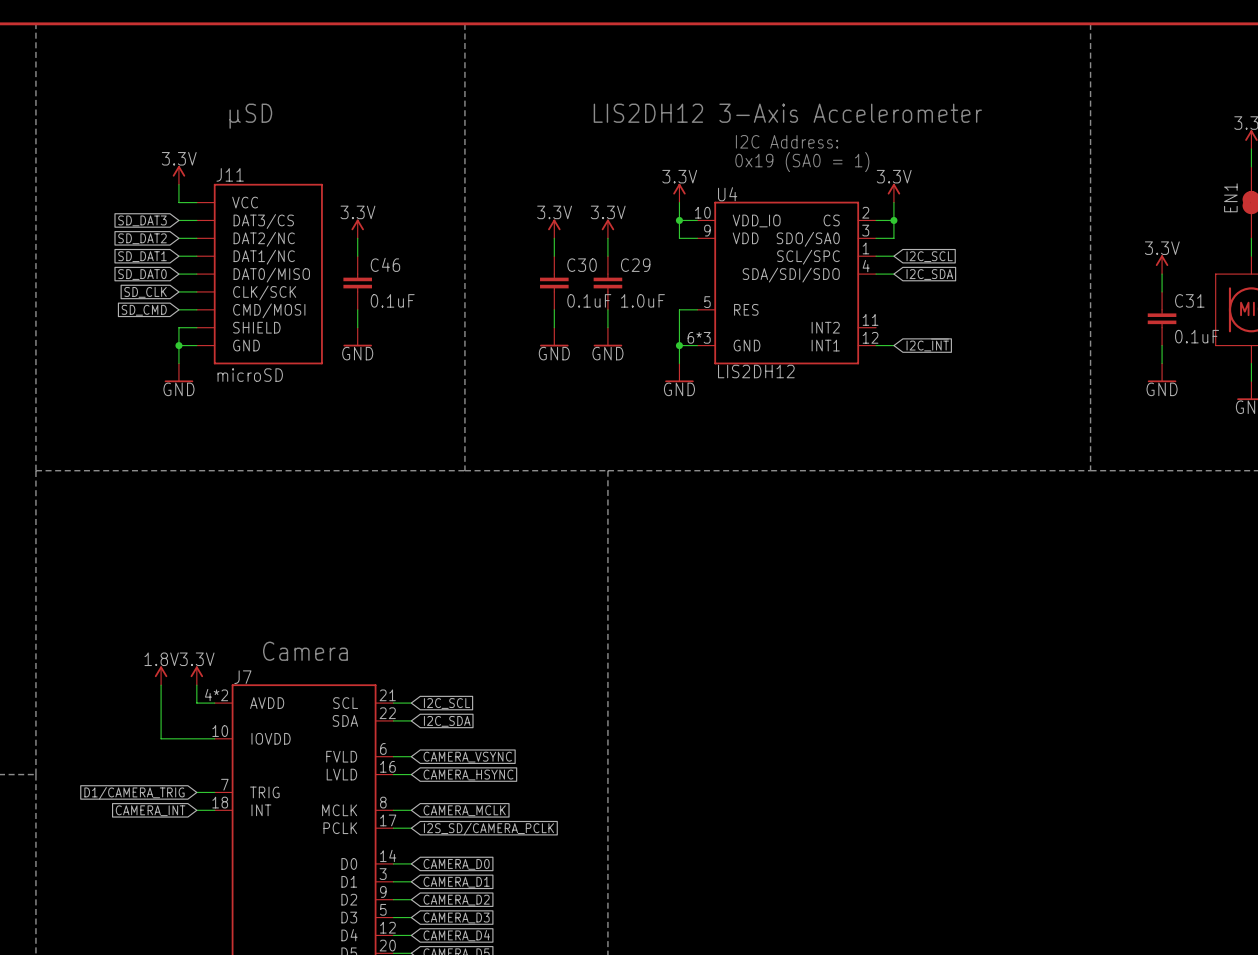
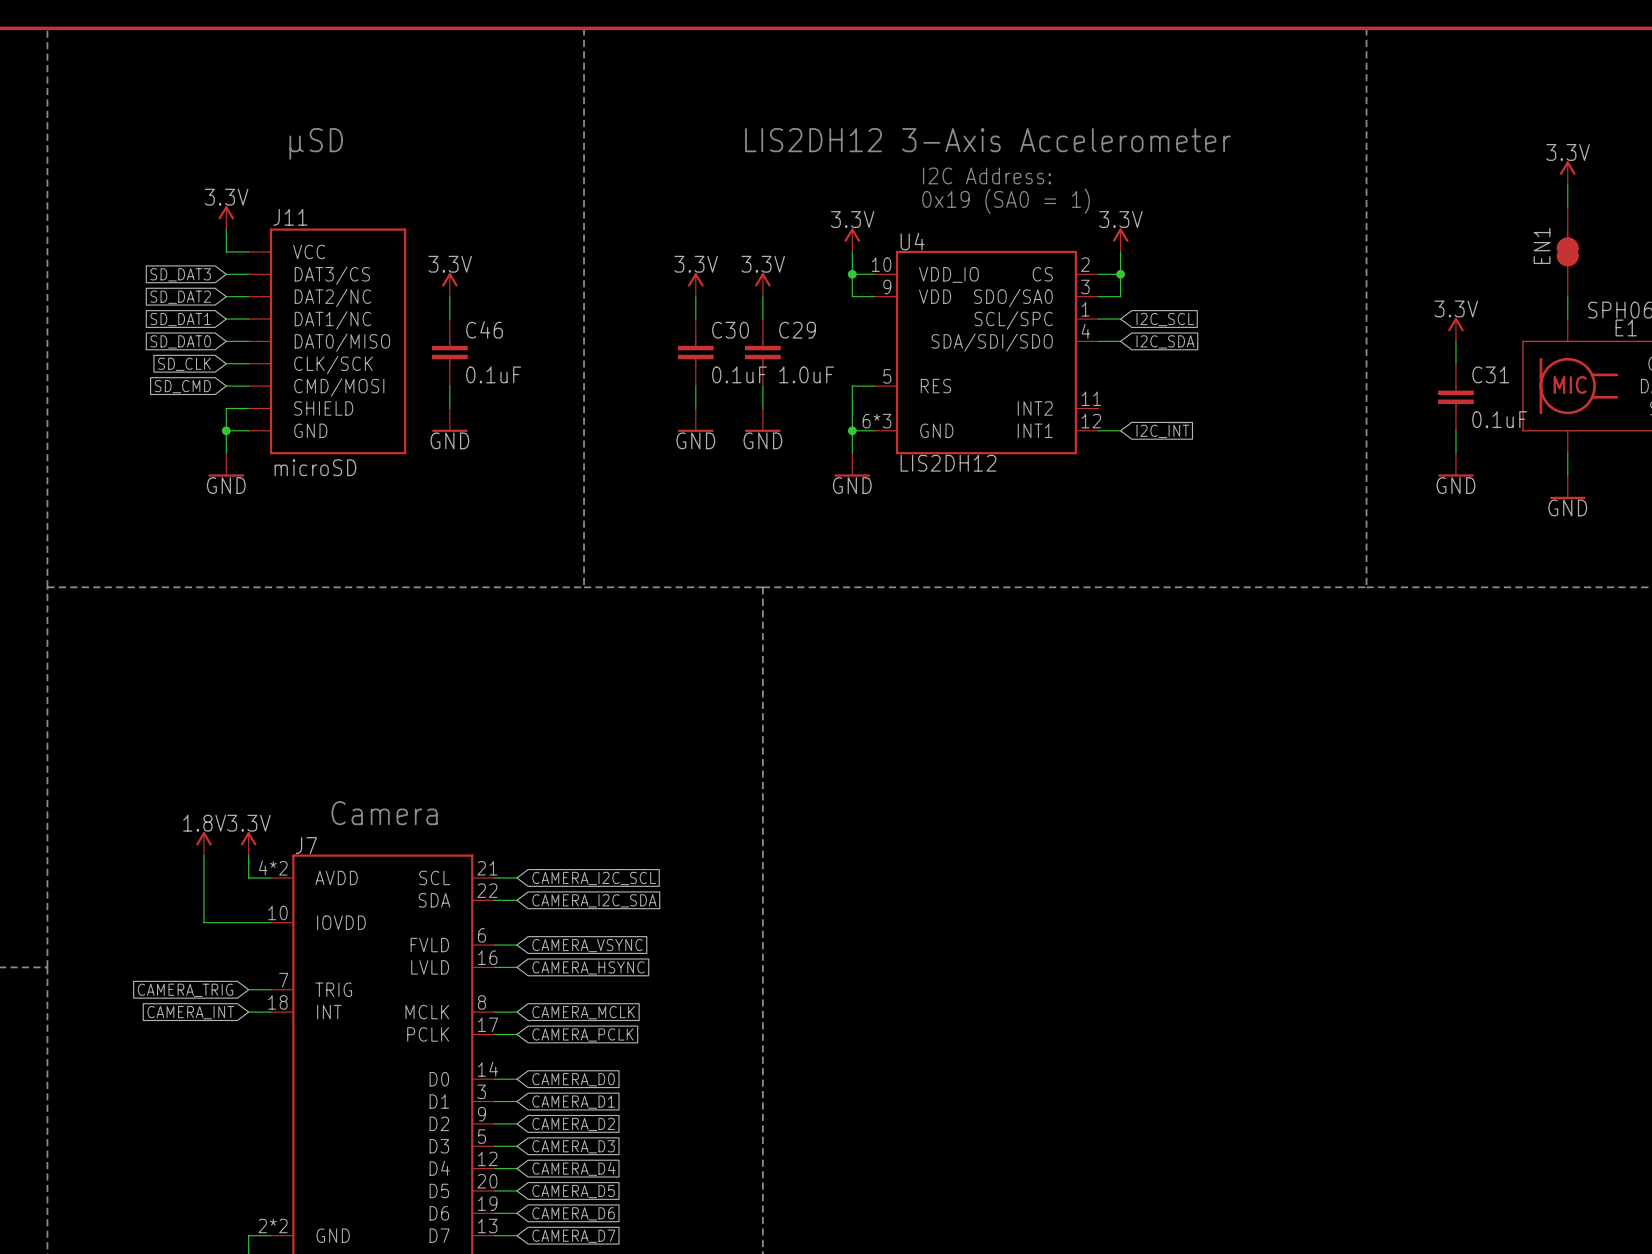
global label: I2C_SCL (447, 703) -> CAMERA_I2C_SCL (594, 878)
global label: I2C_SDA (447, 721) -> CAMERA_I2C_SDA (594, 900)
global label: D1/CAMERA_TRIG (134, 793) -> CAMERA_TRIG (185, 990)
global label: I2S_SD/CAMERA_PCLK (488, 829) -> CAMERA_PCLK (582, 1035)

